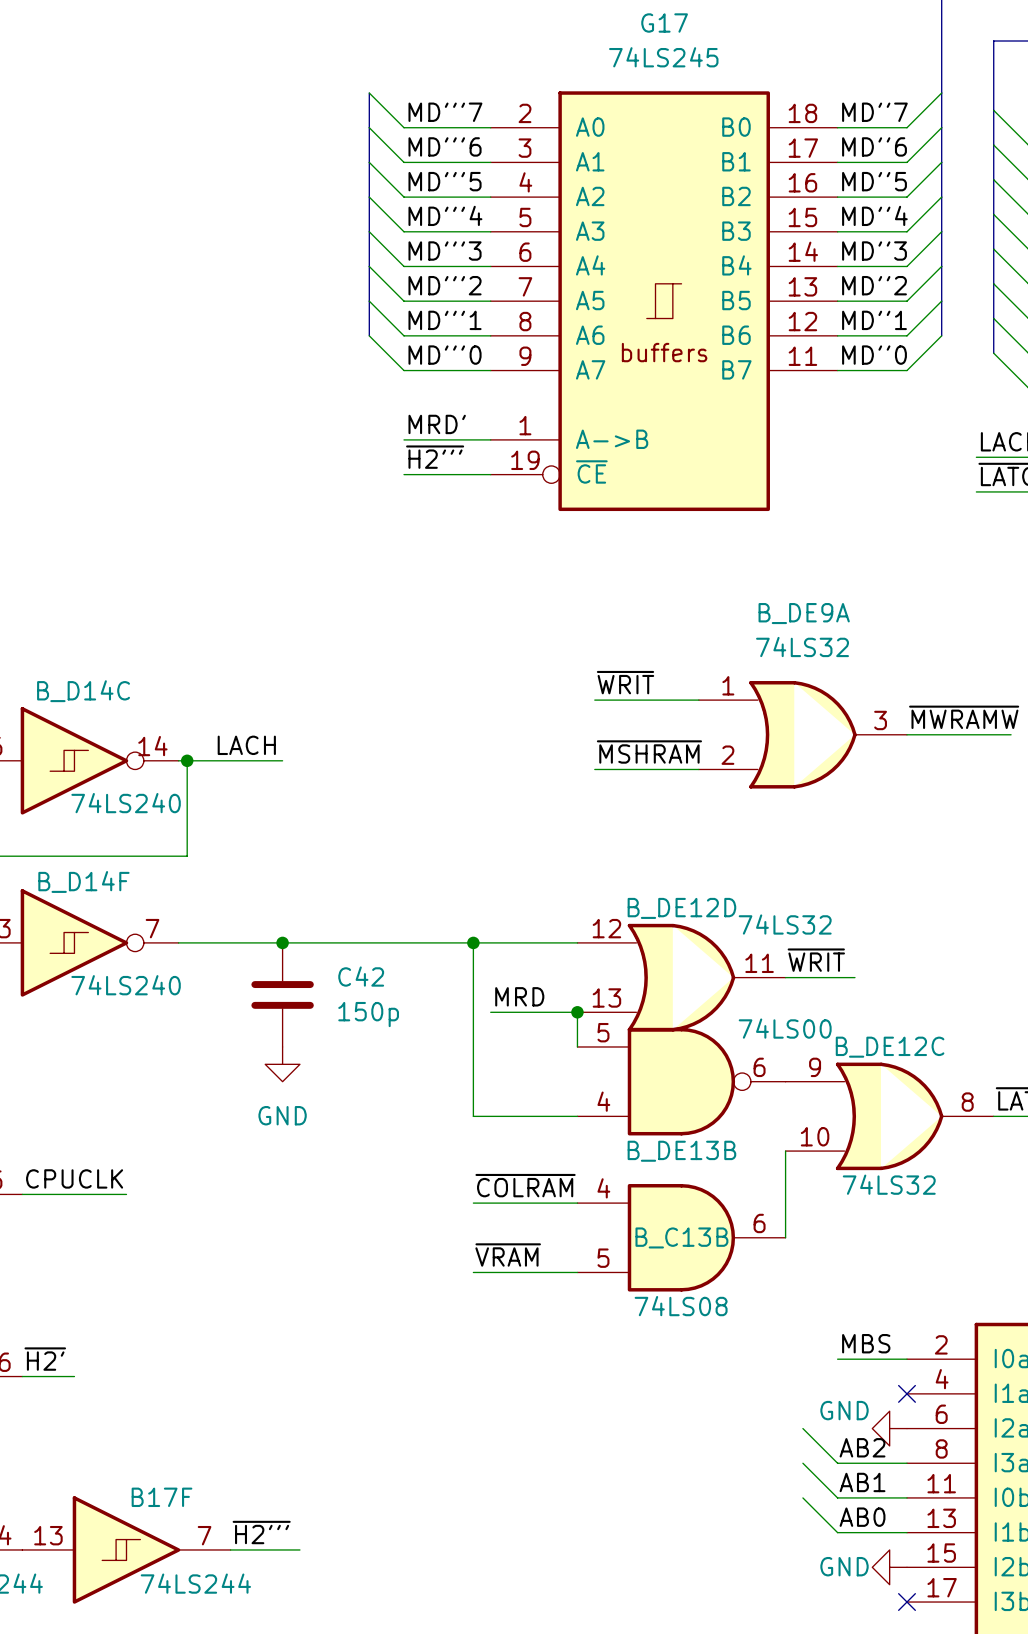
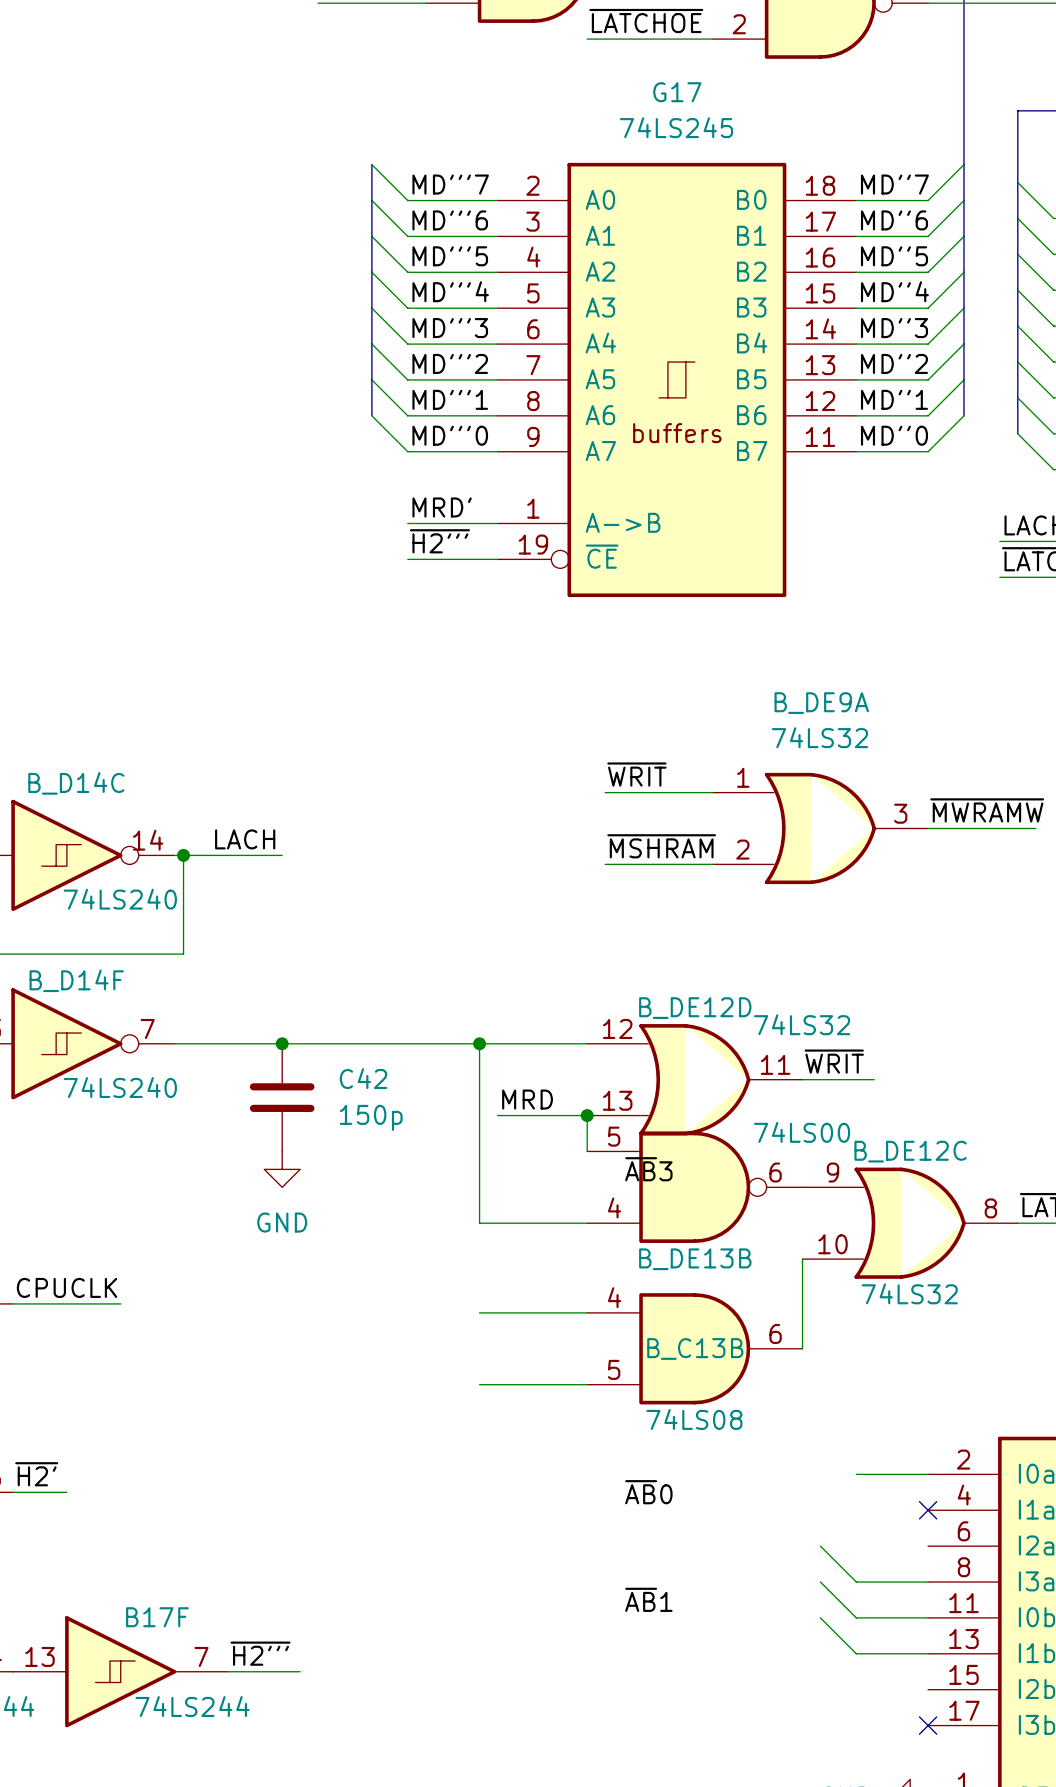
label: none -> ~{AB}3 (648, 1169)
label: ~{COLRAM} (525, 1185) -> none
label: ~{VRAM} (508, 1255) -> none
label: MBS (866, 1343) -> none
label: none -> ~{AB}0 (648, 1492)
power symbol: GND (889, 1428) -> none
label: AB2 (862, 1447) -> none
label: none -> ~{AB}1 (648, 1599)
label: AB1 (862, 1482) -> none
label: AB0 (862, 1517) -> none
power symbol: GND (889, 1567) -> none

